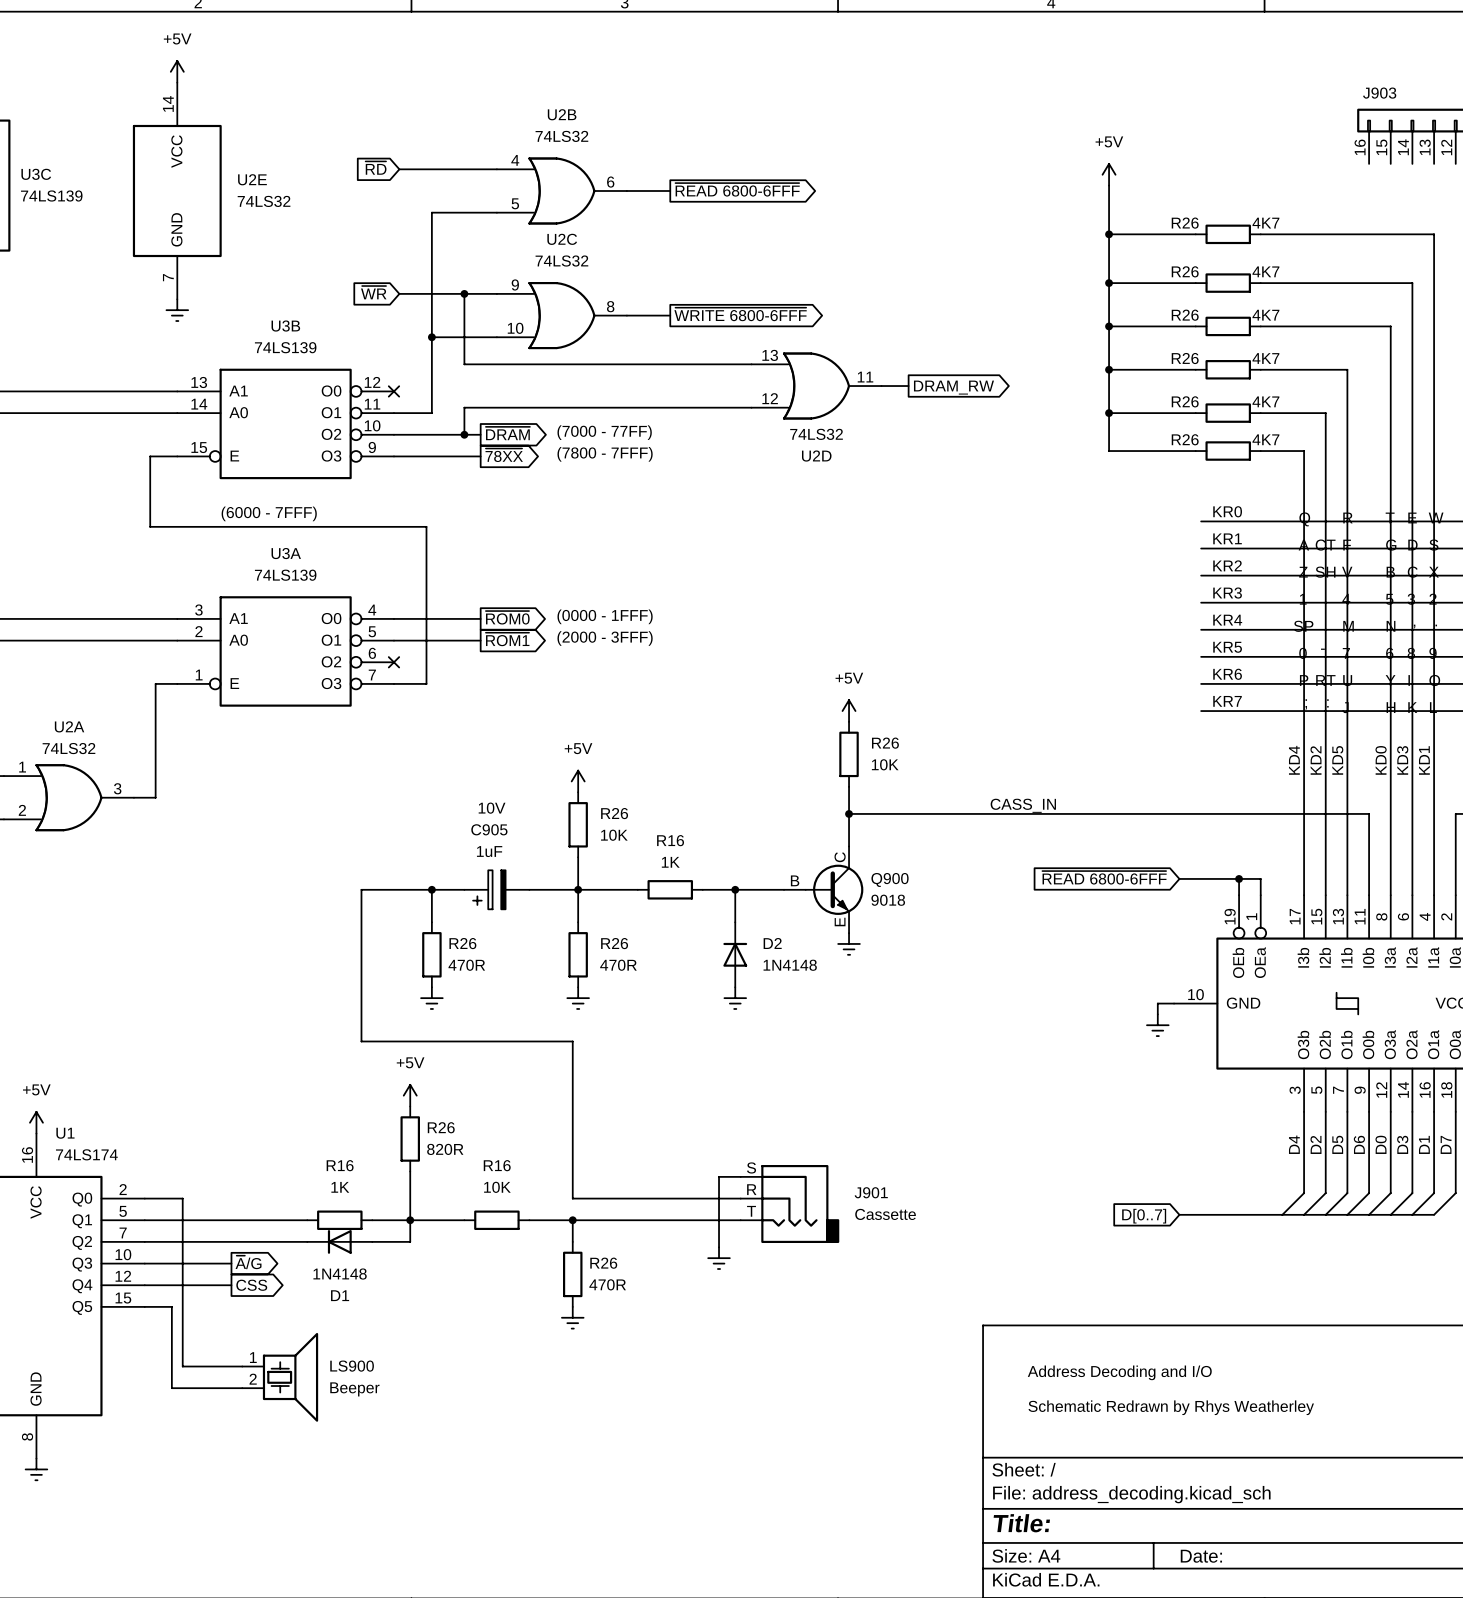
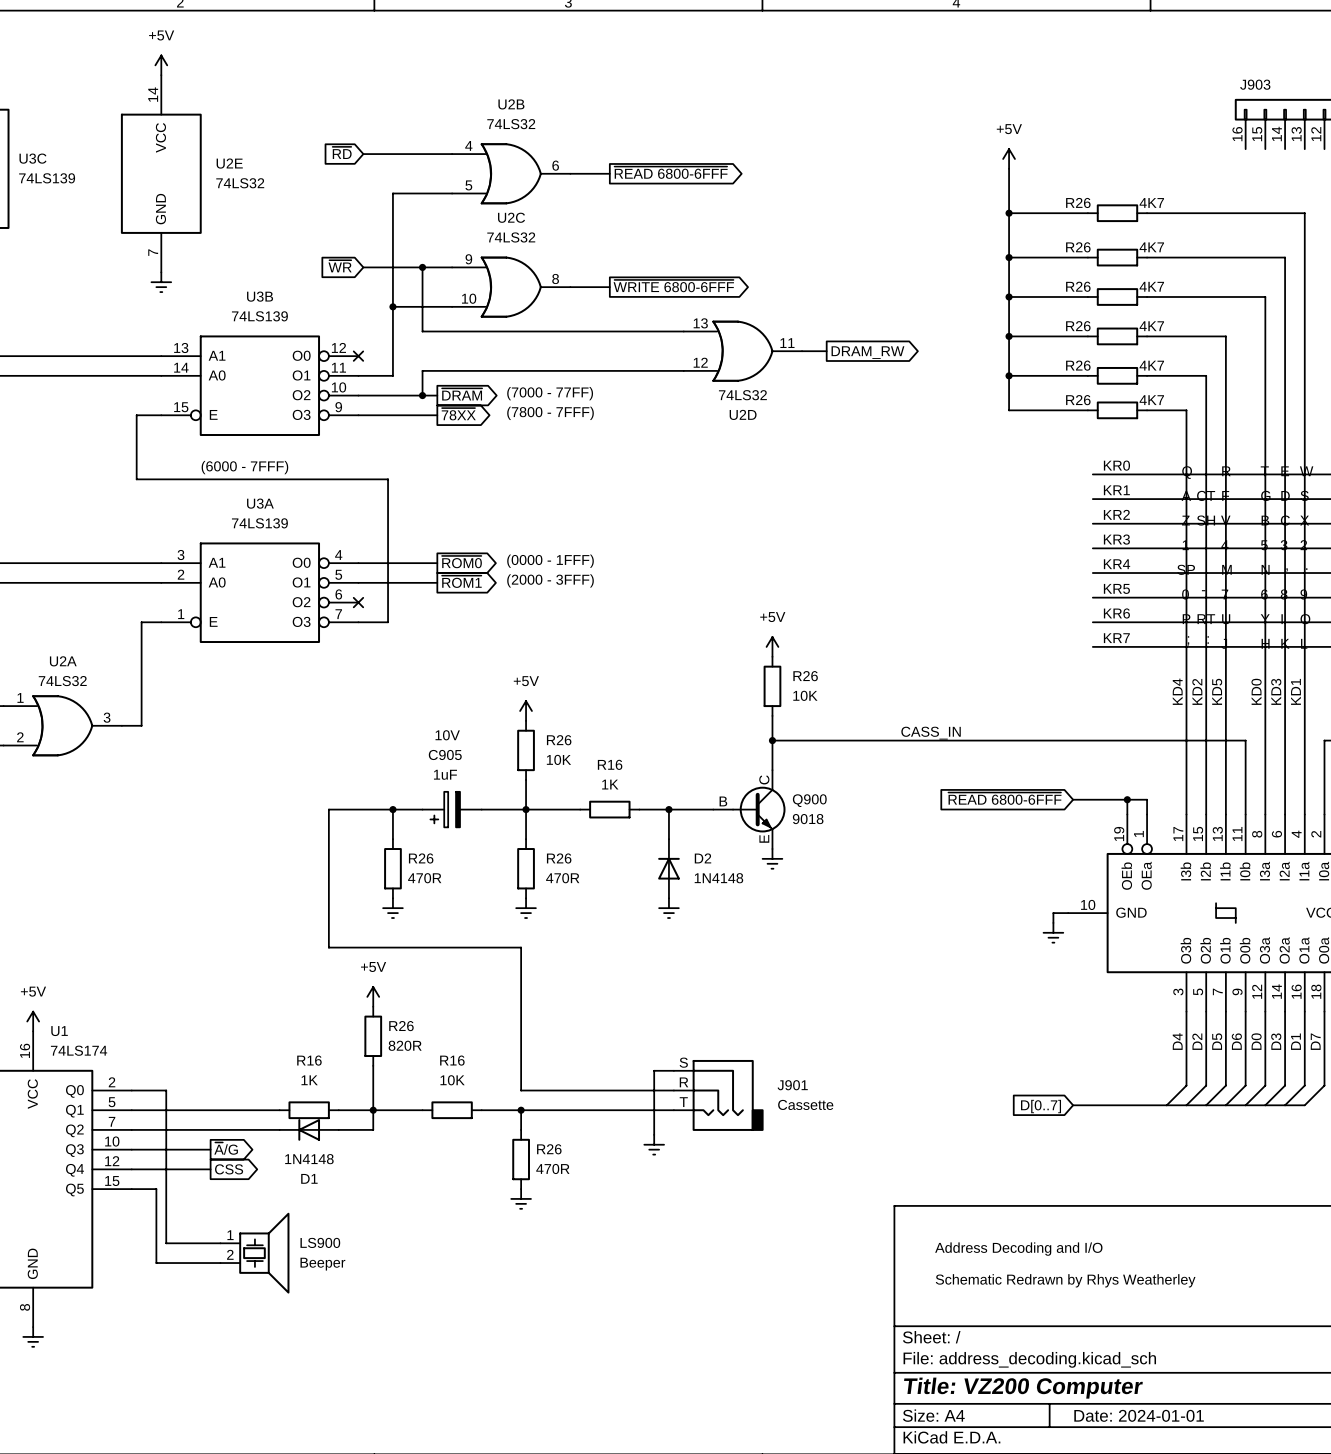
title block: Title: (1021, 1523) -> Title: VZ200 Computer (1023, 1388)
title block: Date: (1201, 1556) -> Date: 2024-01-01 (1139, 1415)

